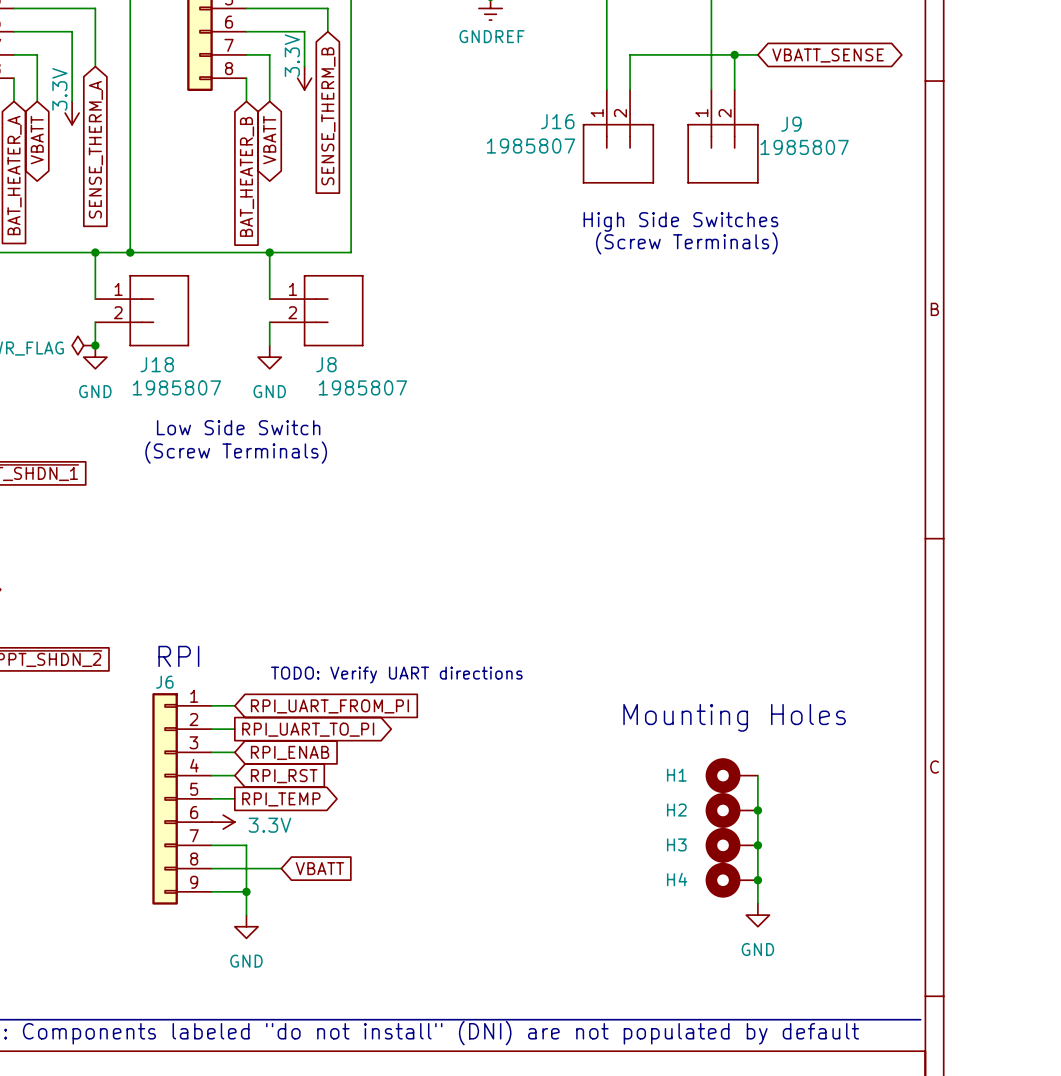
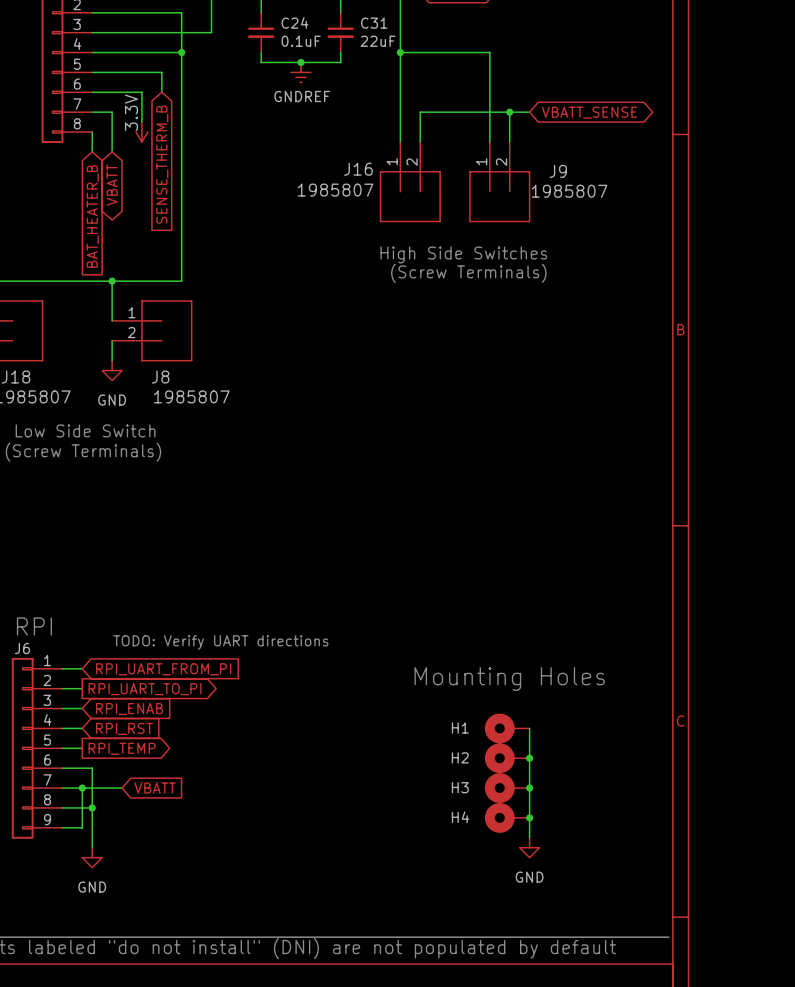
wire: none -> (62, 768) (92, 768) (92, 788) (122, 788)
power symbol: 3.3V (223, 822) -> none
junction: none -> (82, 788)
wire: (246, 868) (281, 868) -> none
global label position: VBATT (319, 868) -> VBATT (155, 788)
wire: (234, 891) (246, 891) -> (82, 827) (82, 788)
junction position: (246, 891) -> (92, 807)

